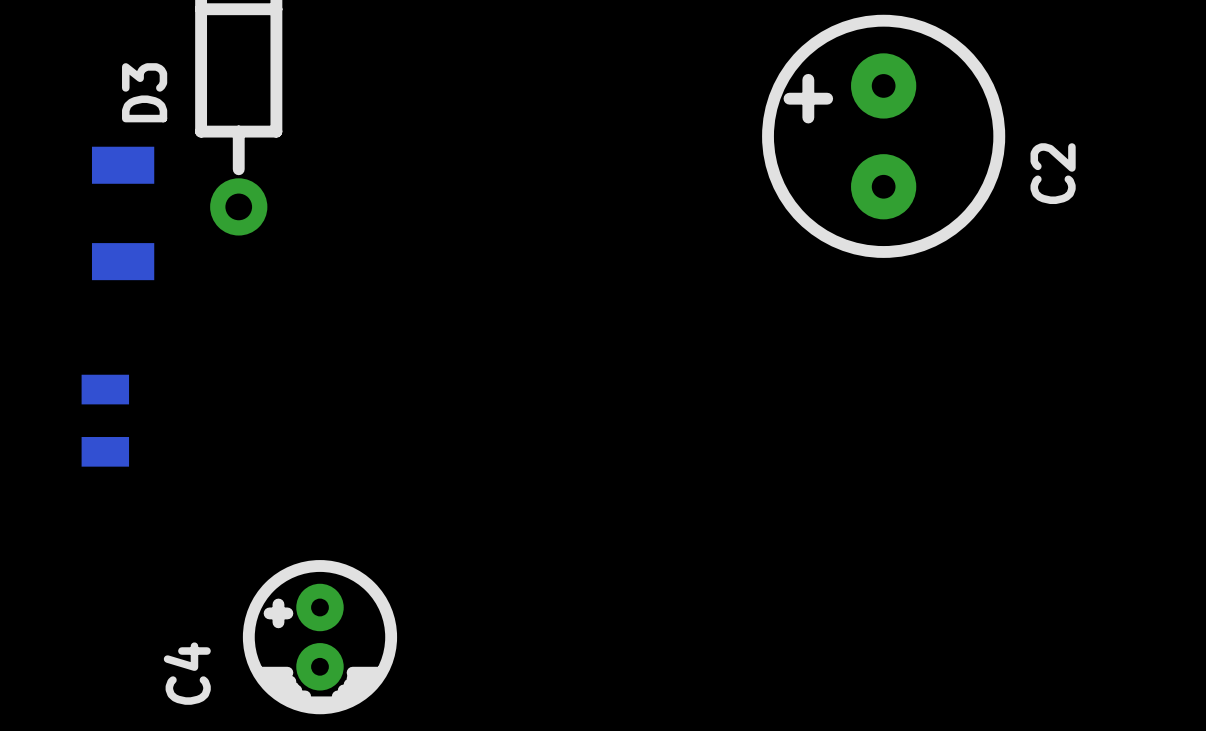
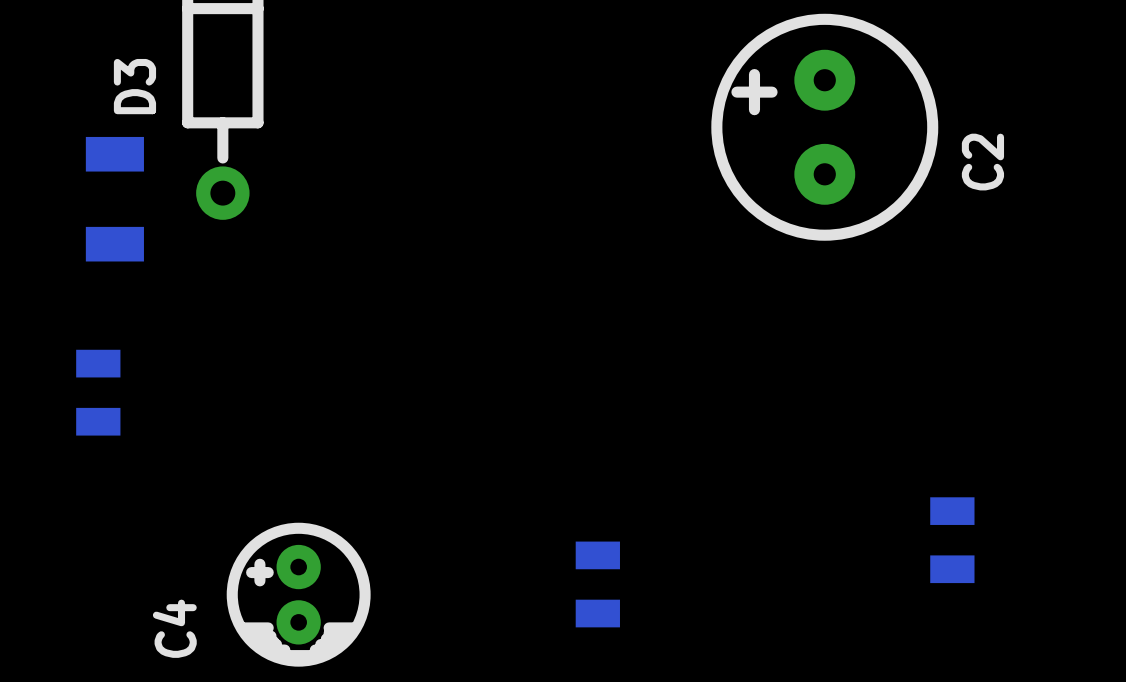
part: none -> (952, 540)
part: none -> (597, 584)

